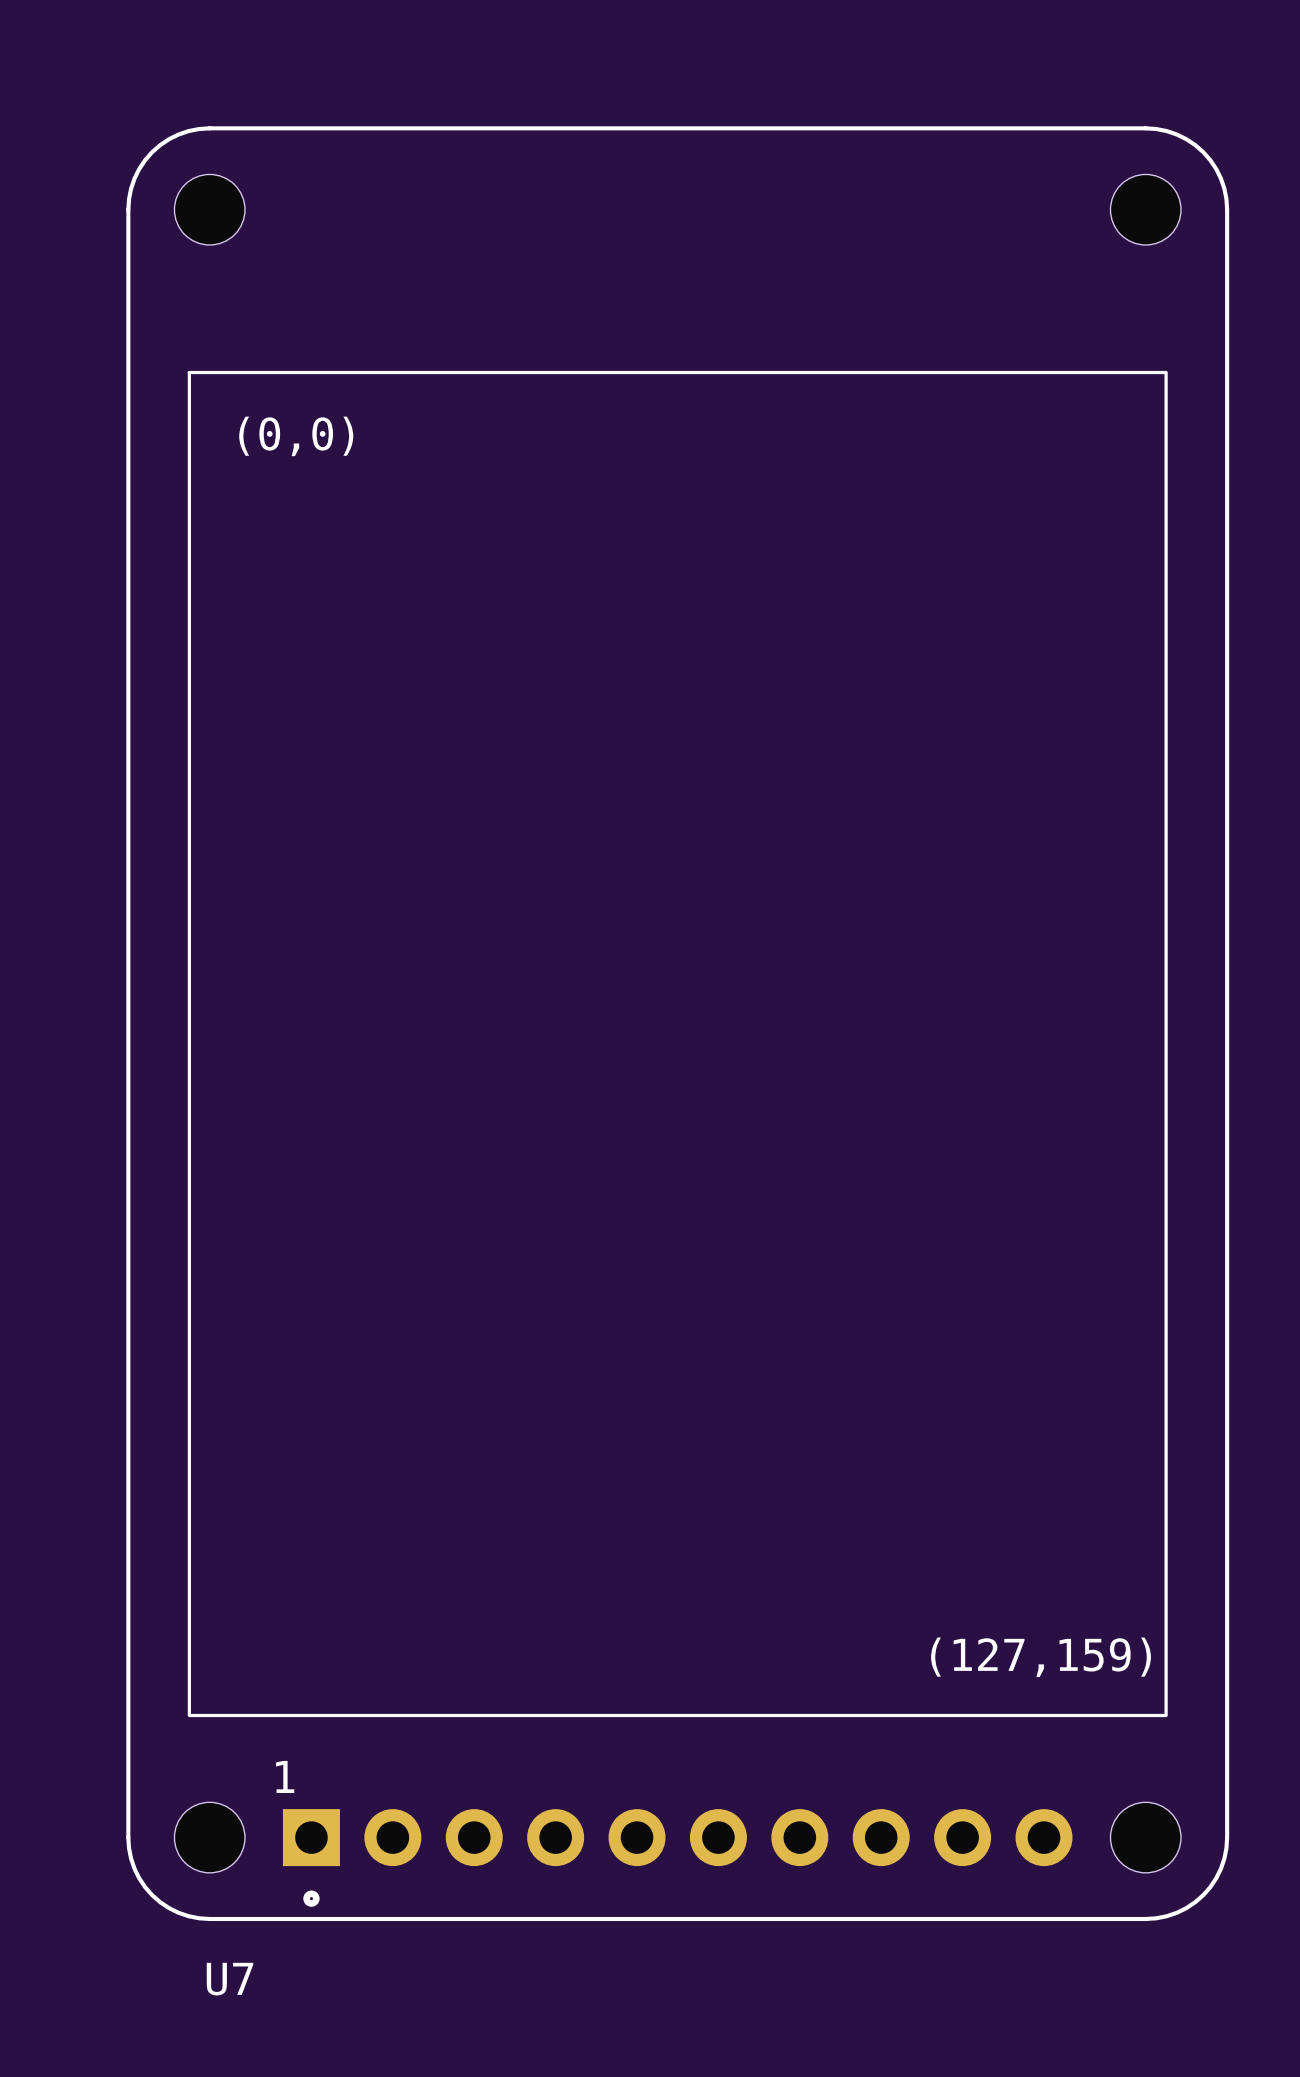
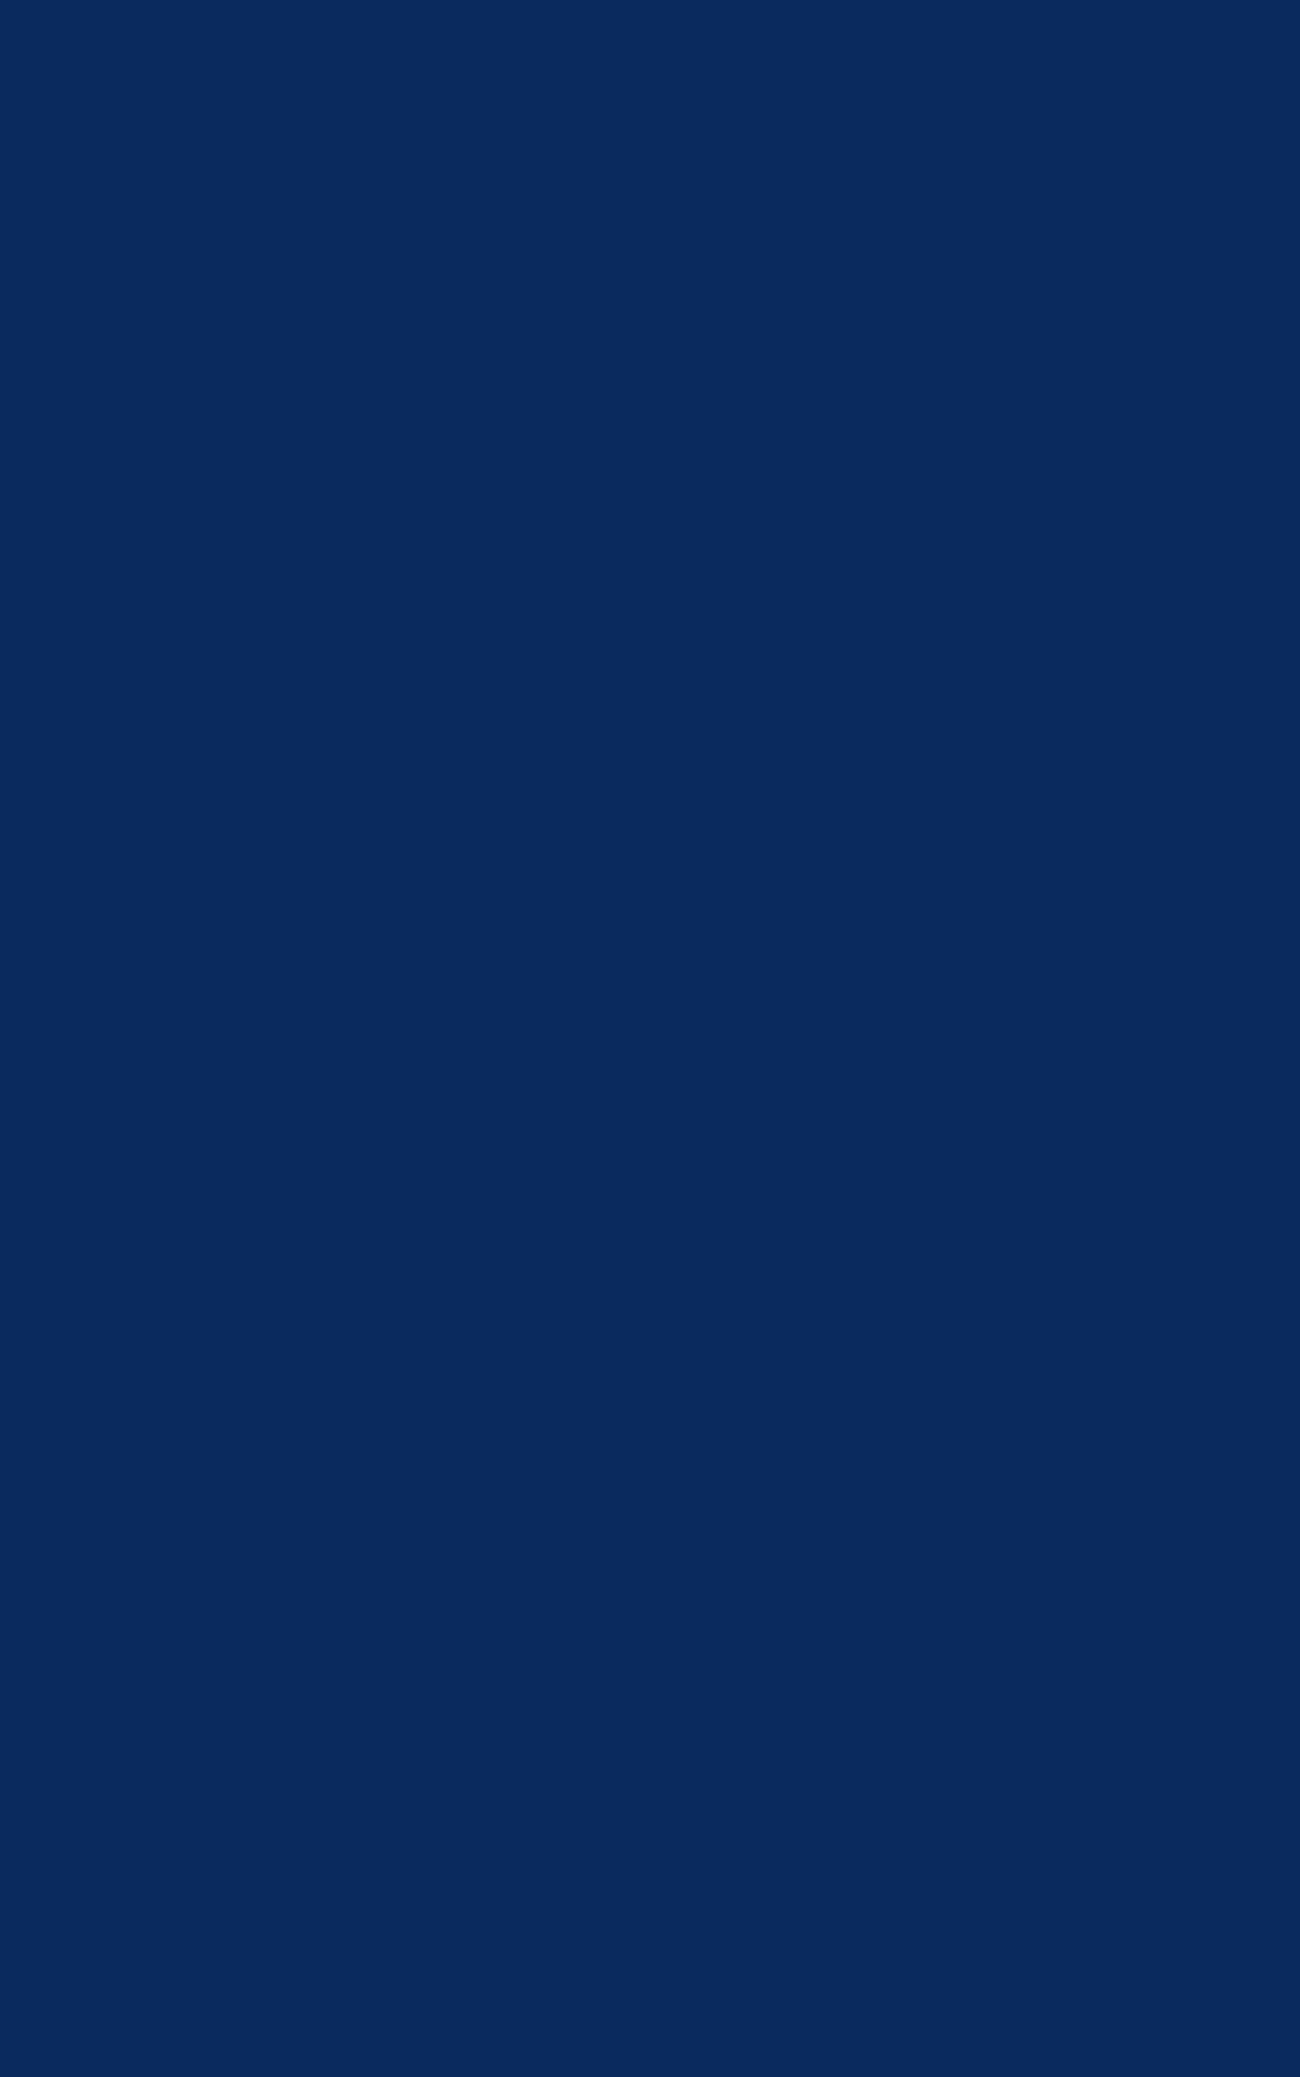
U7: (677, 1023) -> none

